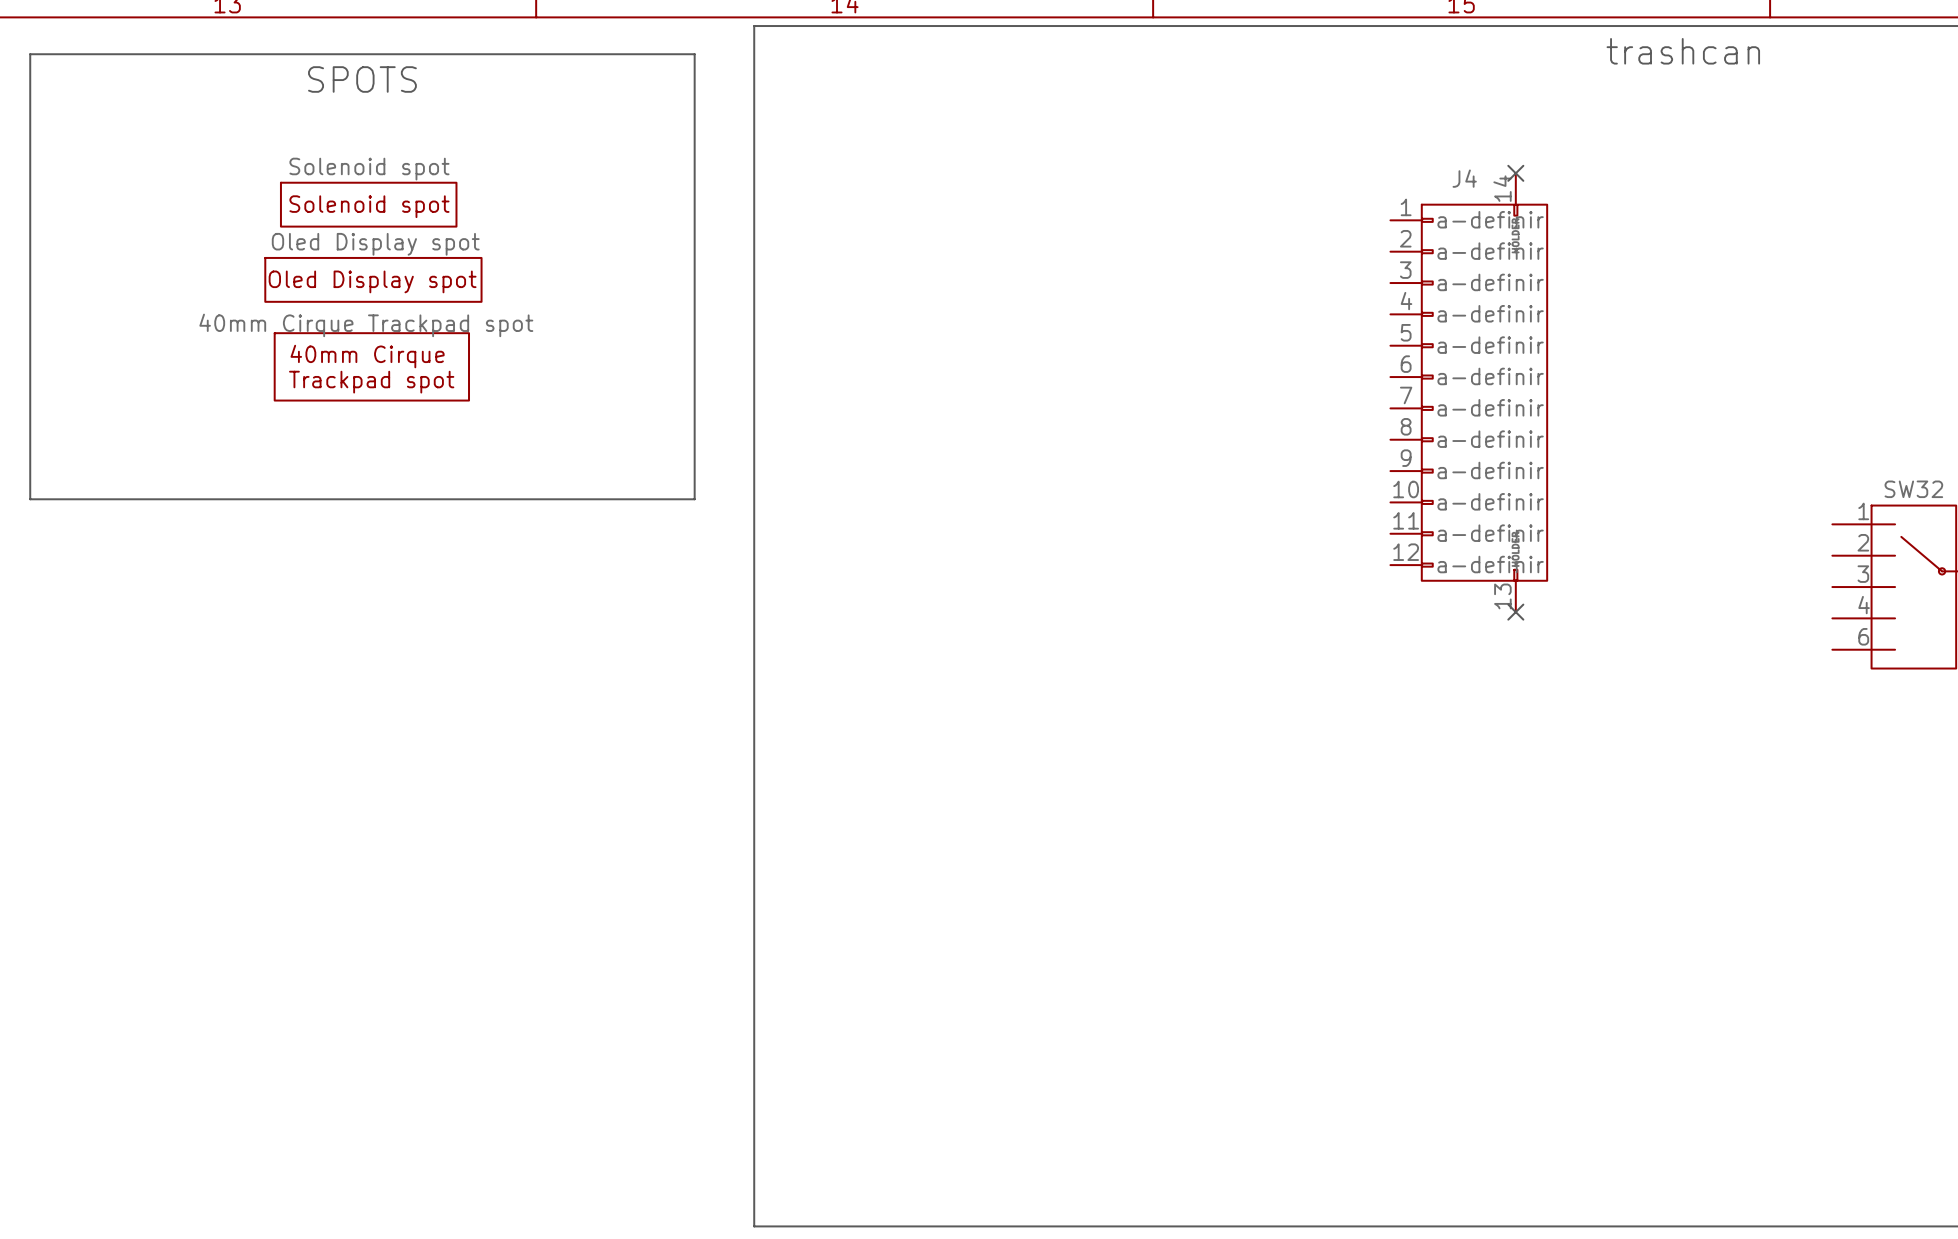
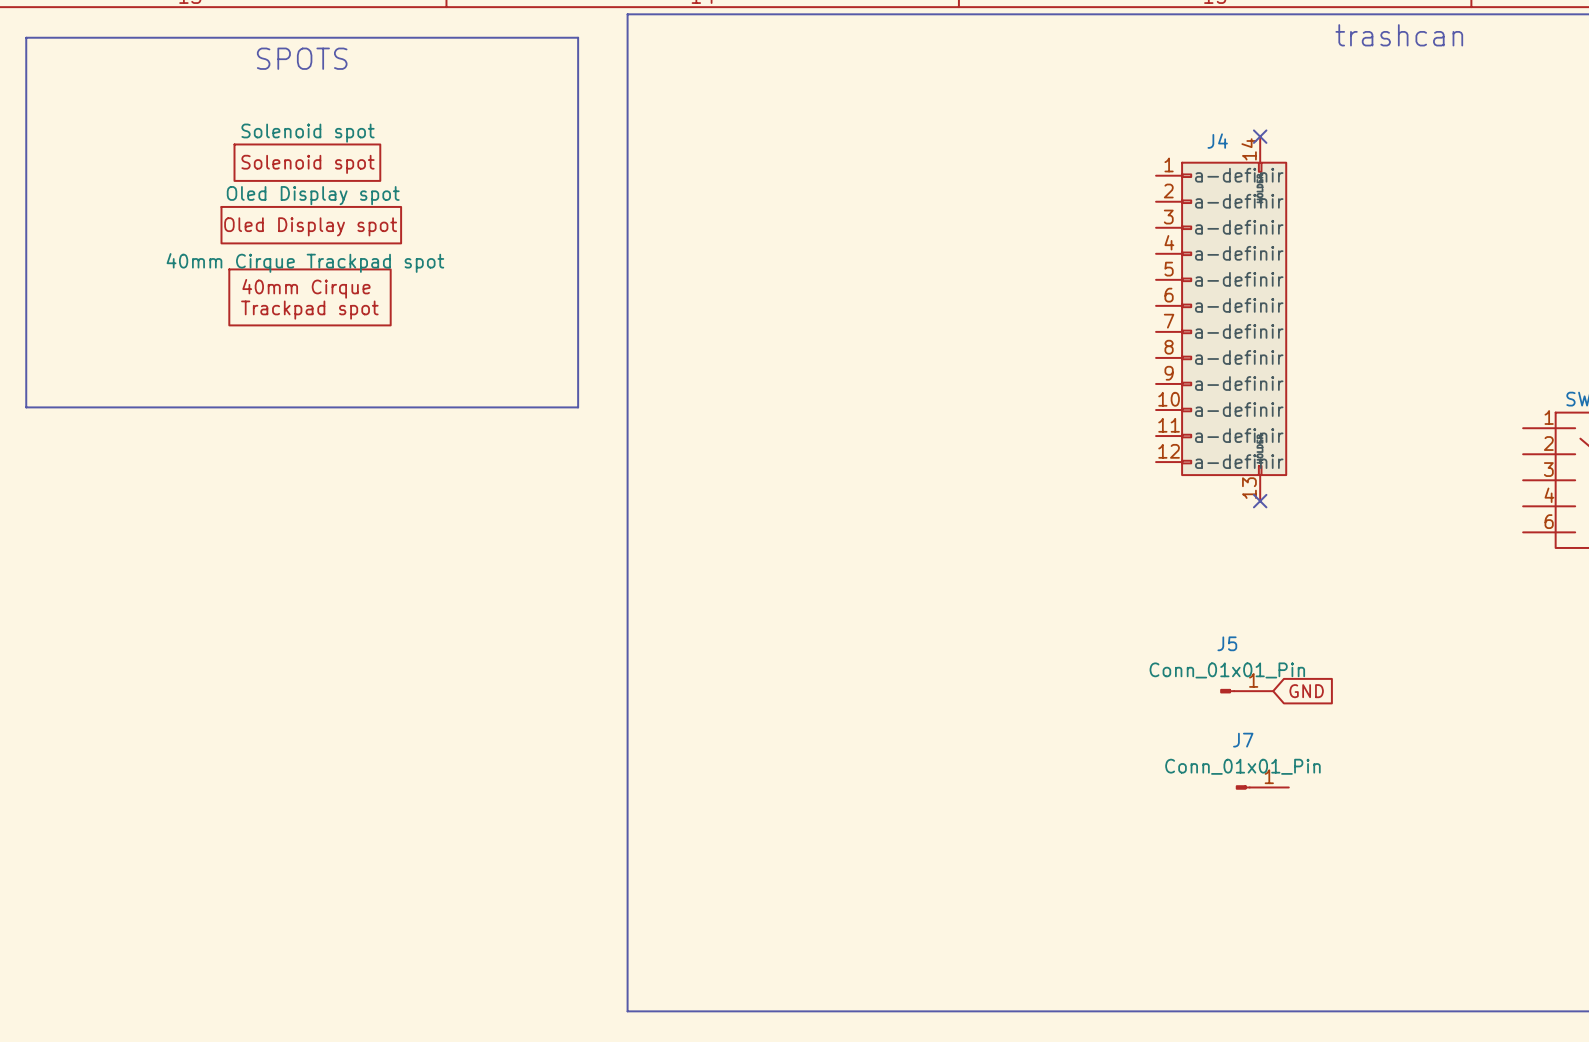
J5: none -> Conn_01x01_Pin (1246, 691)
global label: none -> GND (1306, 691)
J7: none -> Conn_01x01_Pin (1262, 787)

